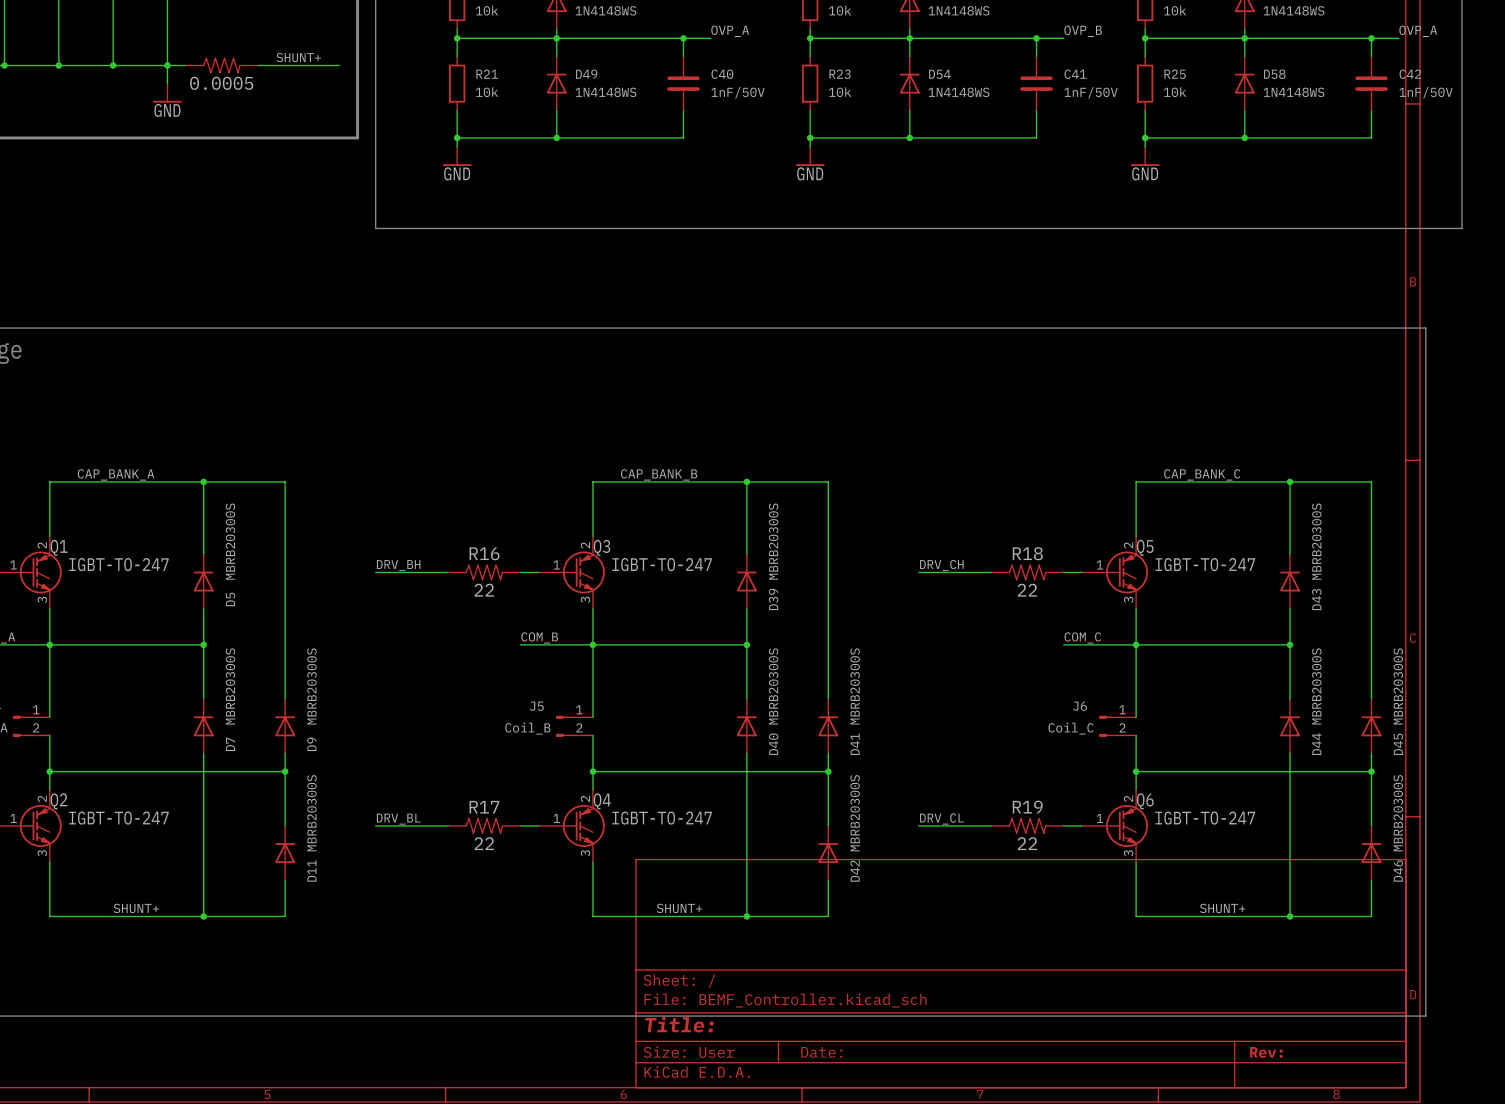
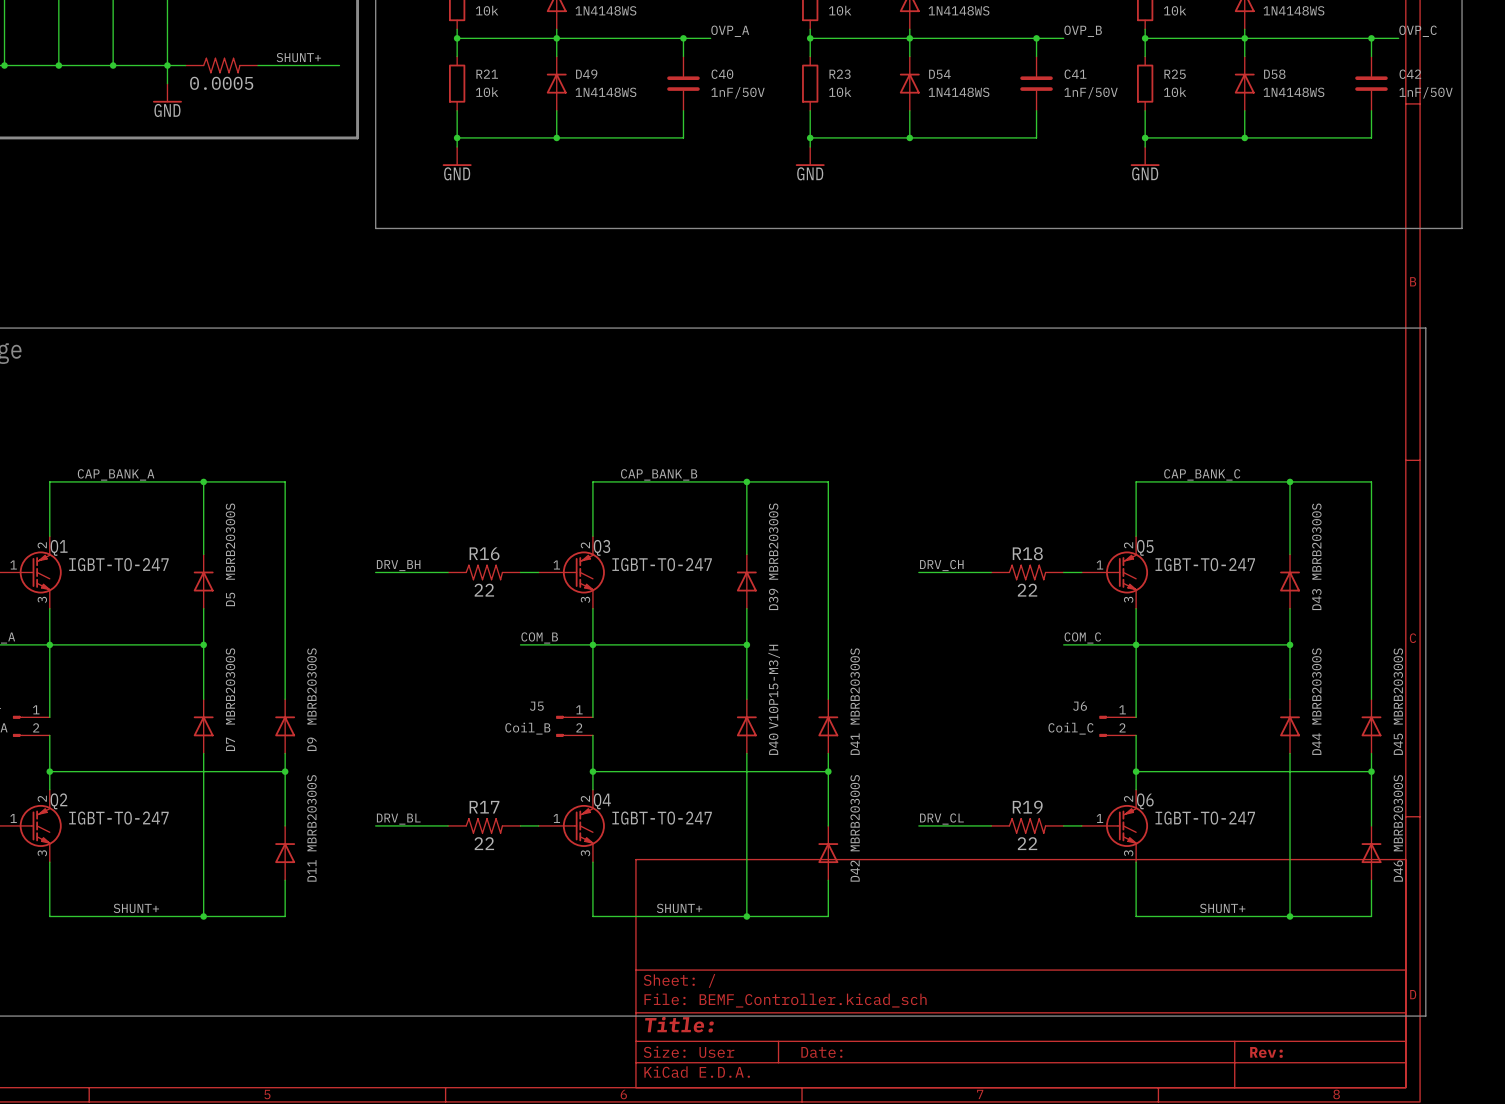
label: OVP_A (1418, 31) -> OVP_C (1418, 31)
D40 value: MBRB20300S (773, 686) -> V10P15-M3/H (774, 686)

